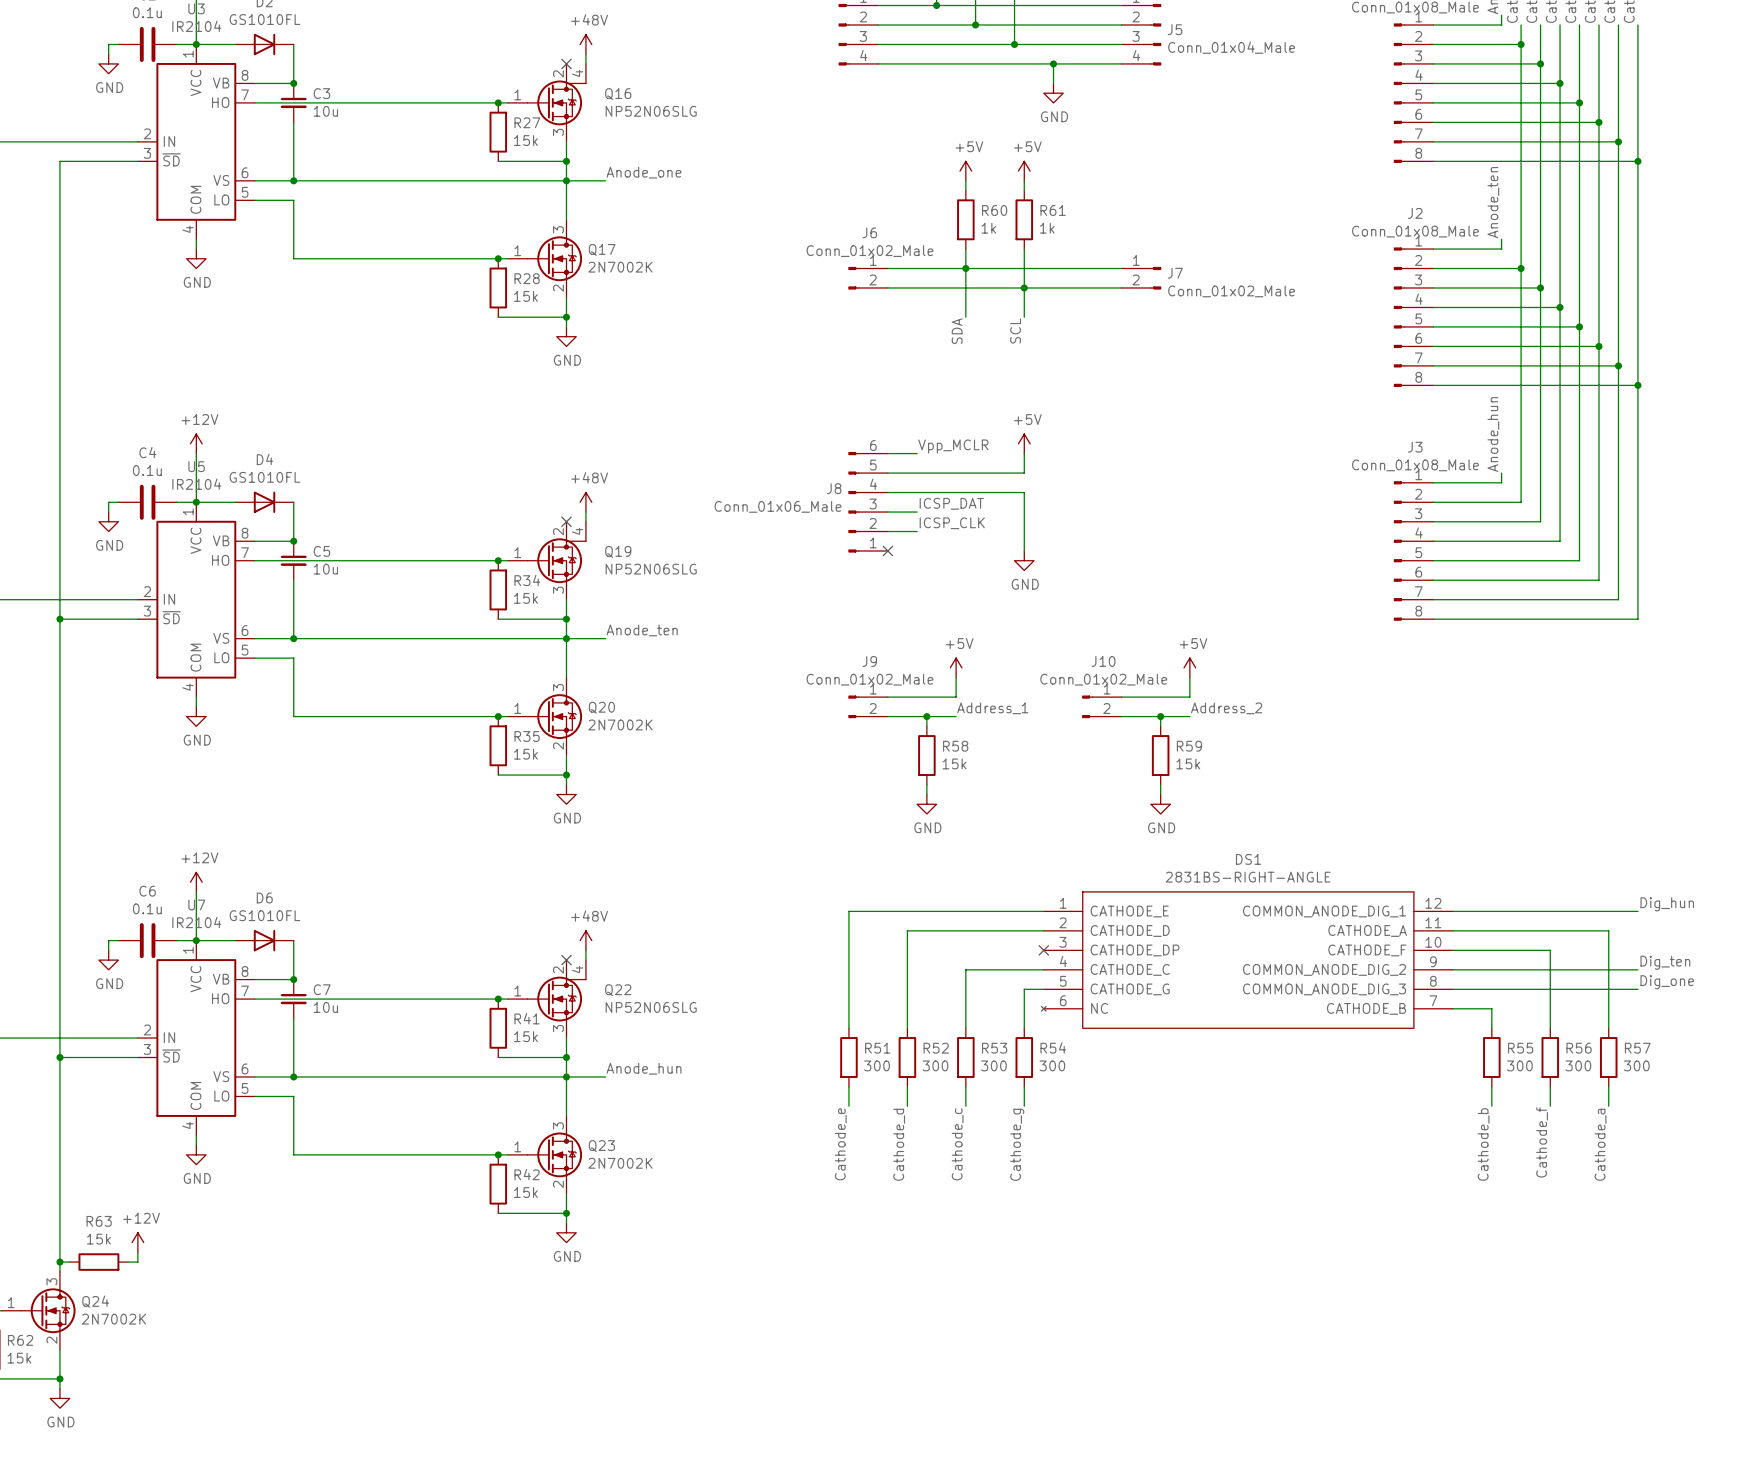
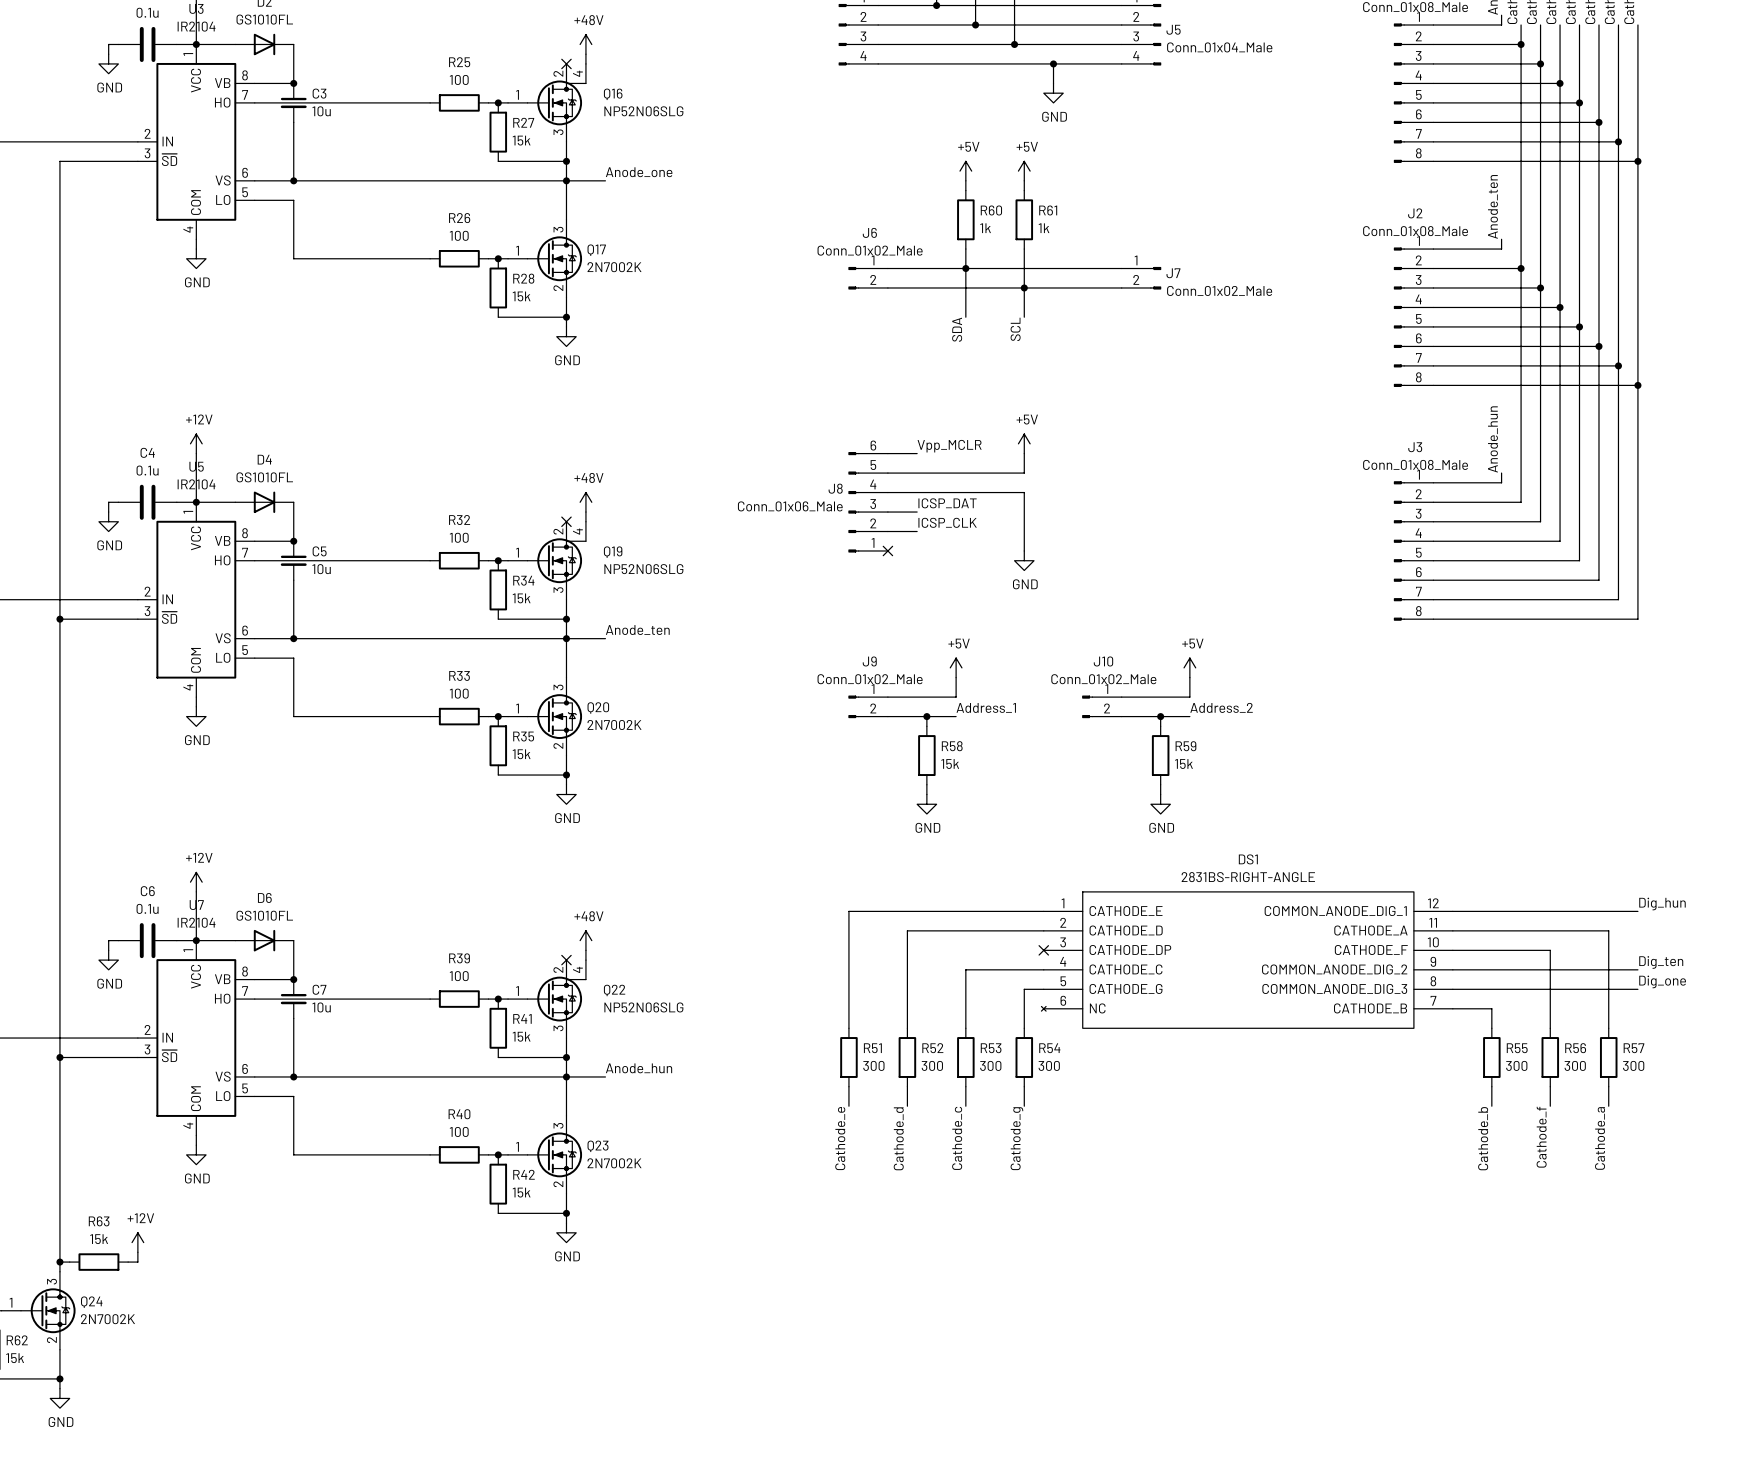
wire: (430, 102) (488, 102) -> none
R25: none -> 100 (459, 102)
wire: (430, 258) (488, 258) -> none
R26: none -> 100 (459, 258)
wire: (430, 560) (488, 560) -> none
R32: none -> 100 (459, 560)
wire: (430, 716) (488, 716) -> none
R33: none -> 100 (459, 716)
wire: (430, 999) (488, 999) -> none
R39: none -> 100 (459, 999)
wire: (430, 1154) (488, 1154) -> none
R40: none -> 100 (459, 1154)

